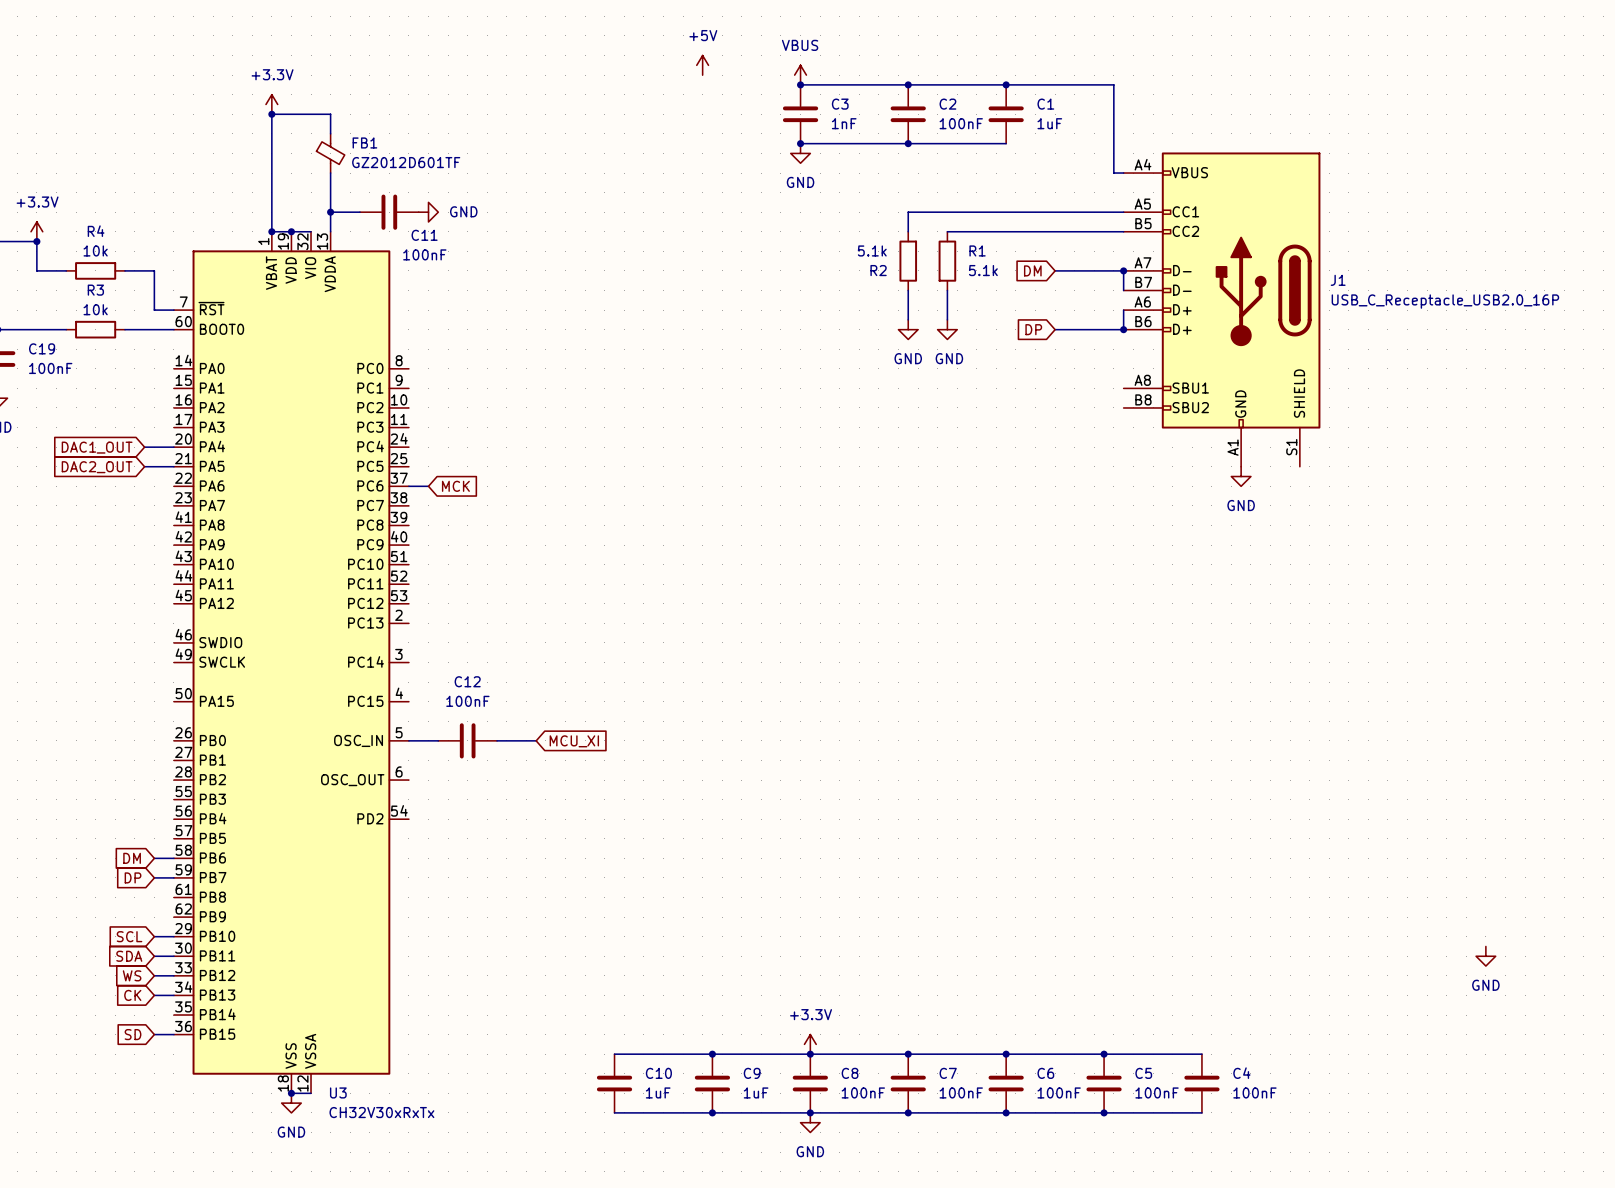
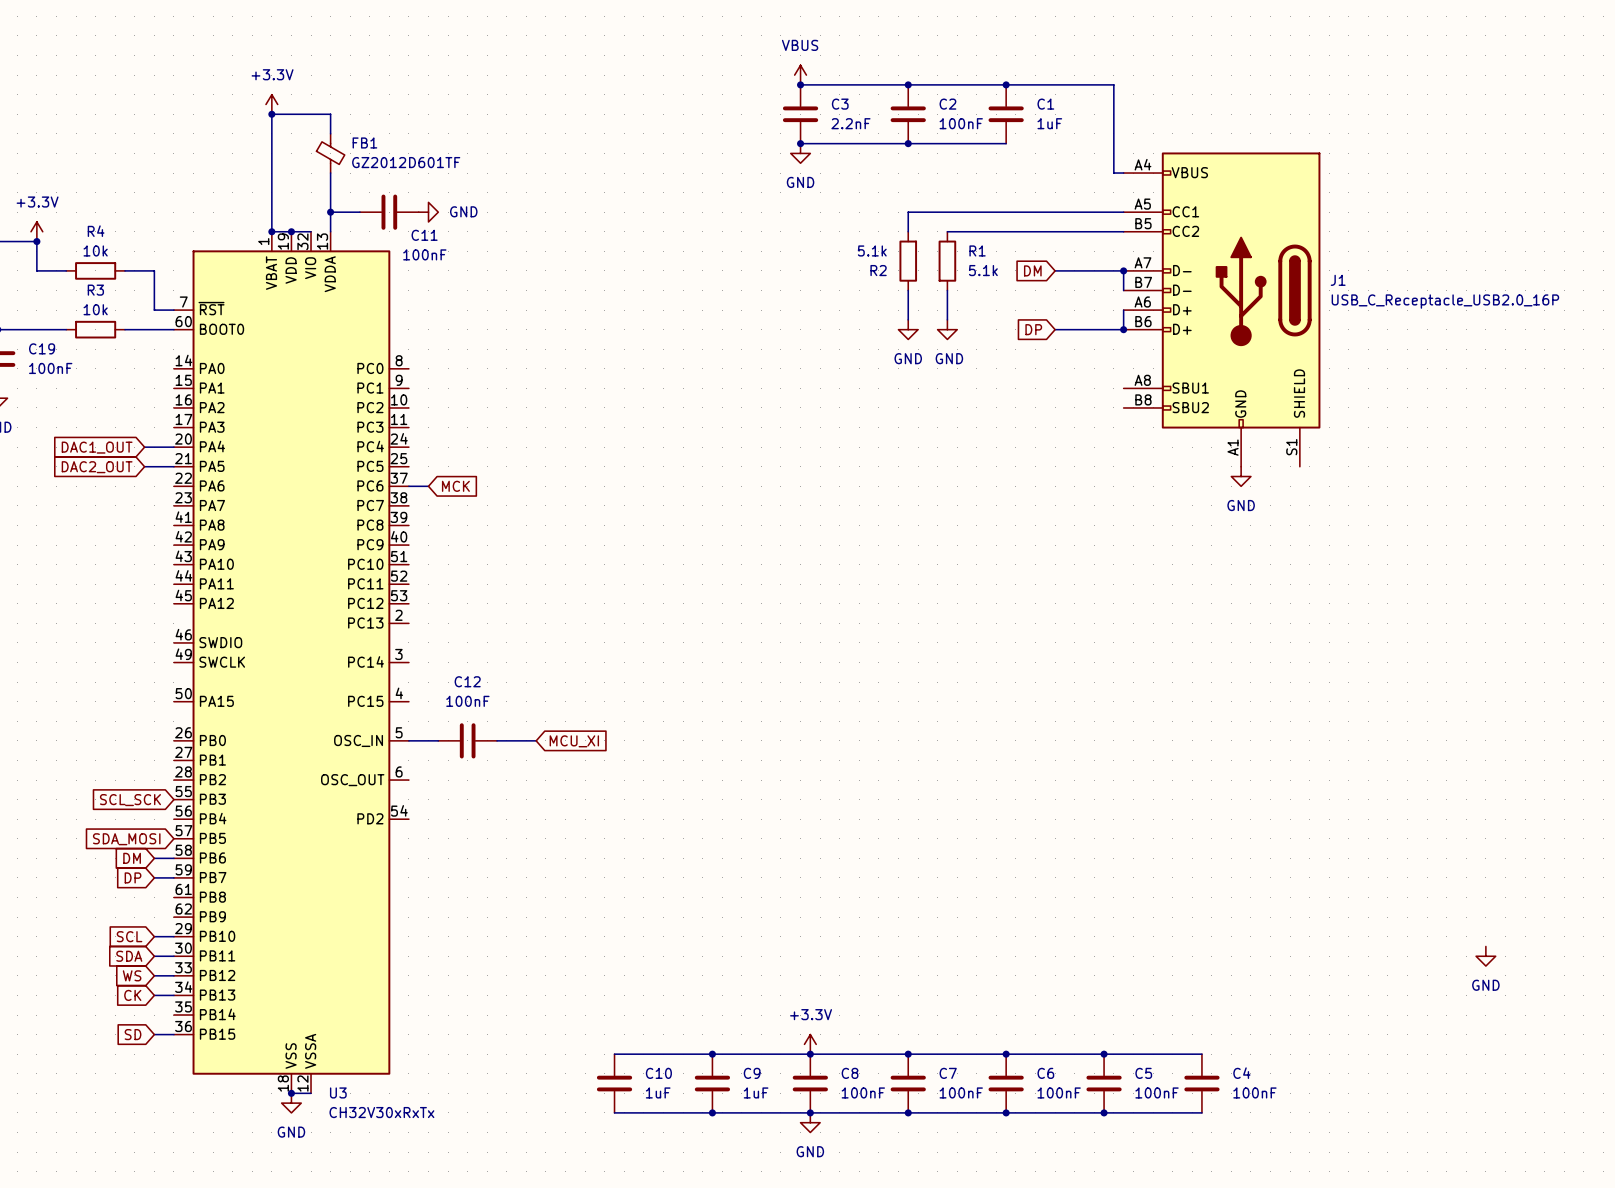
power symbol: +5V (702, 65) -> none
C3 value: 1nF (844, 123) -> 2.2nF (850, 123)
global label: none -> SCL_SCK (130, 800)
global label: none -> SDA_MOSI (126, 839)

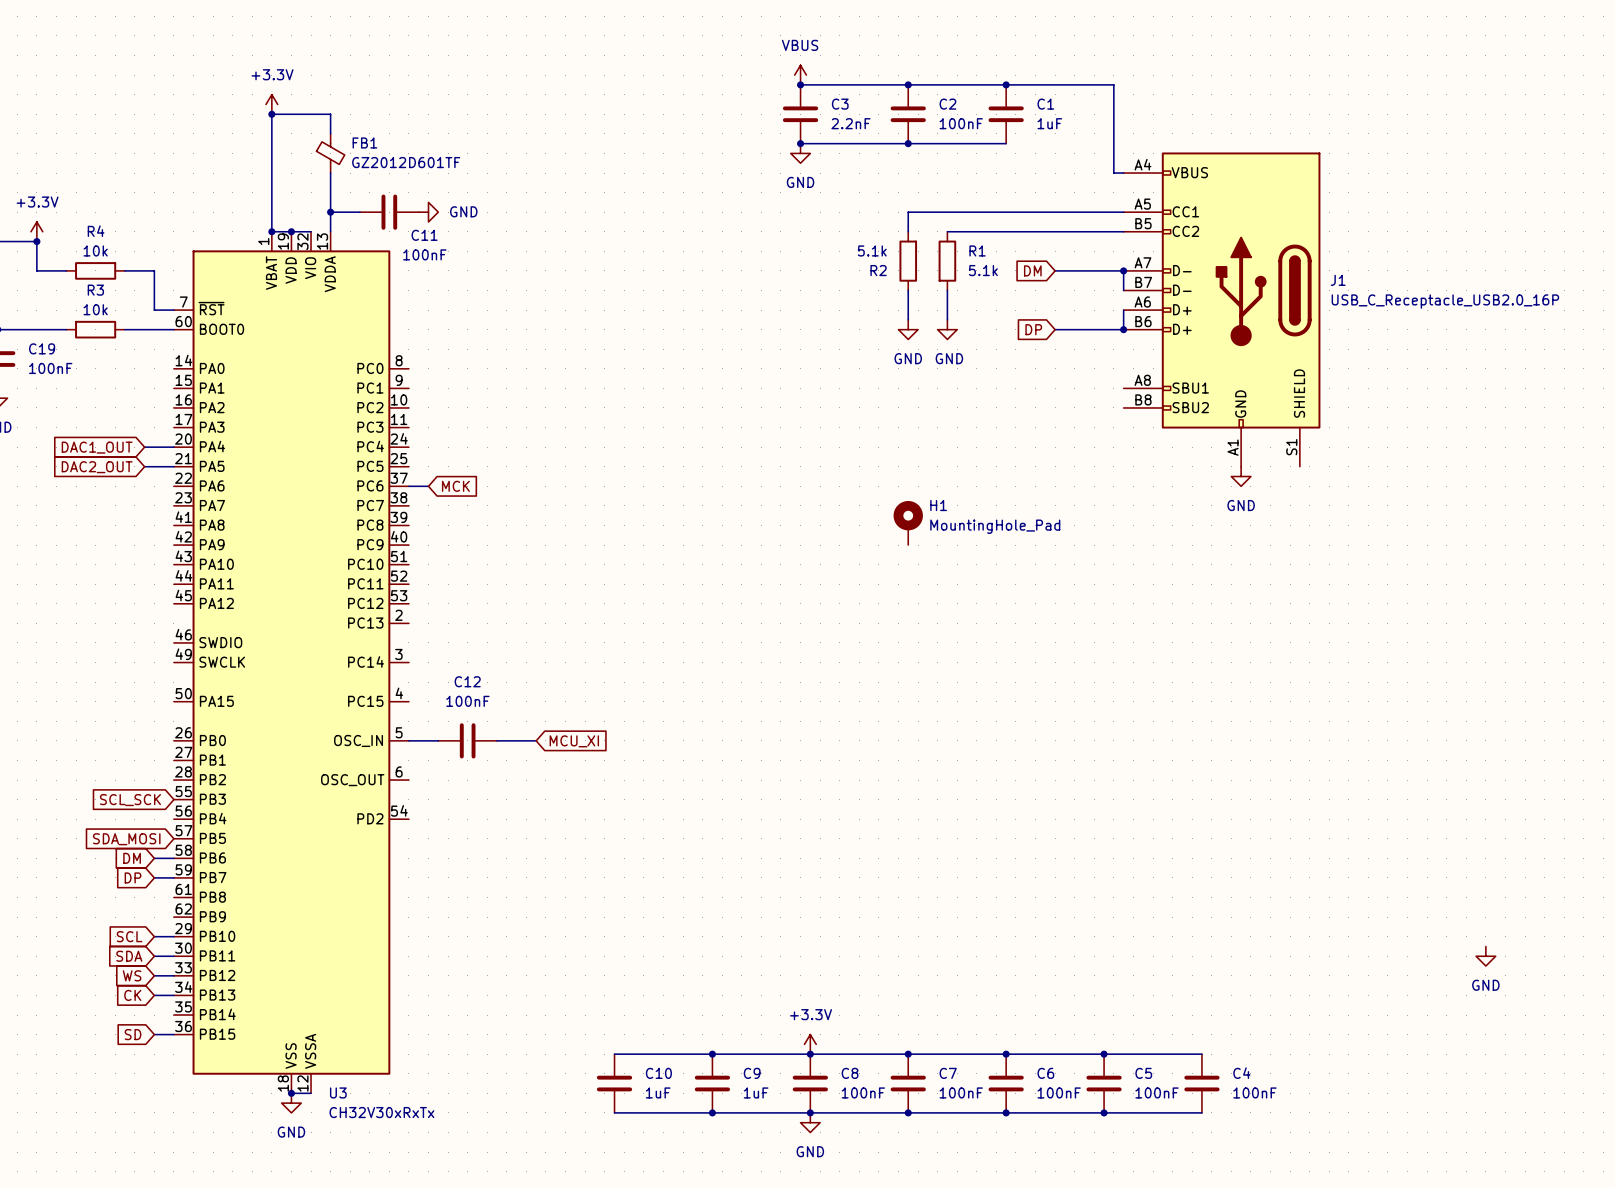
H1: none -> MountingHole_Pad (908, 523)

